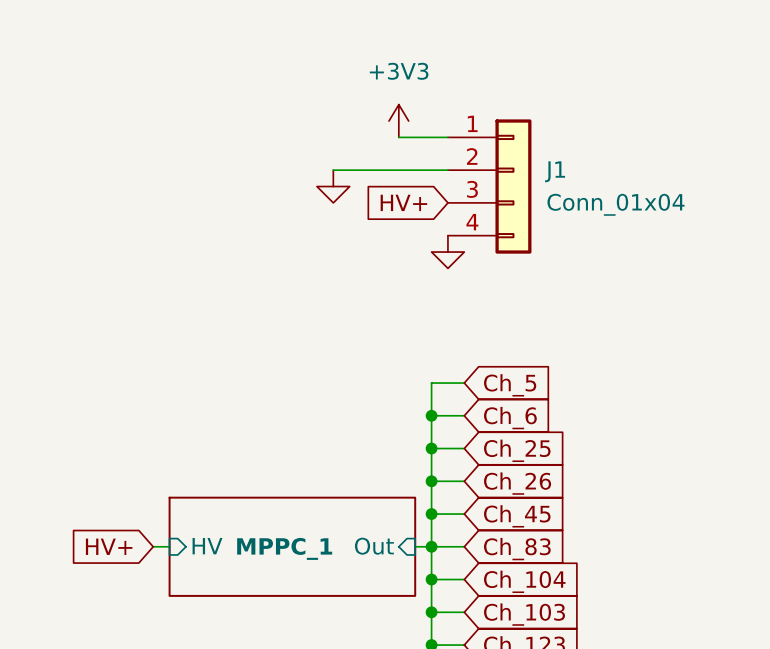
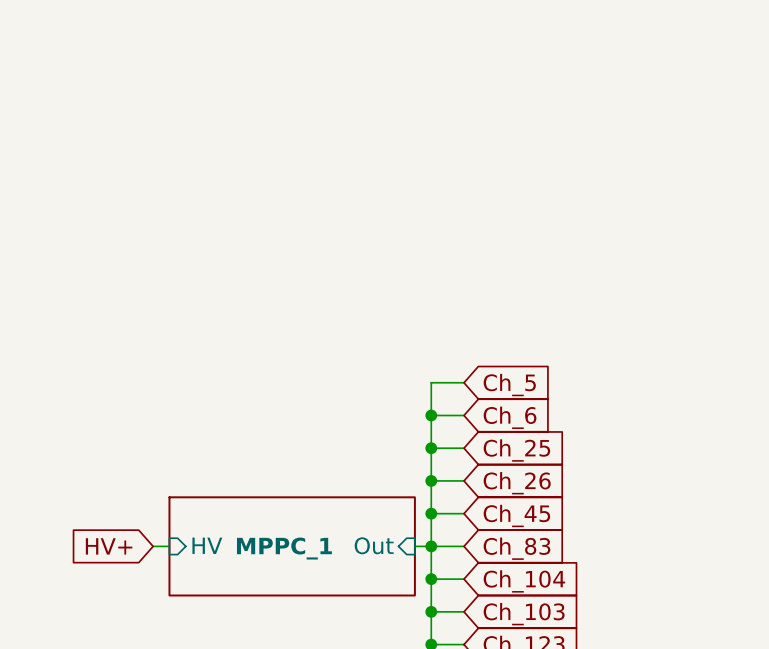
power symbol: +3V3 (398, 121) -> none
wire: (398, 137) (447, 137) -> none
wire: (333, 170) (447, 170) -> none
power symbol: (333, 186) -> none
J1: Conn_01x04 (489, 186) -> none
global label: HV+ (403, 202) -> none
power symbol: (447, 252) -> none

